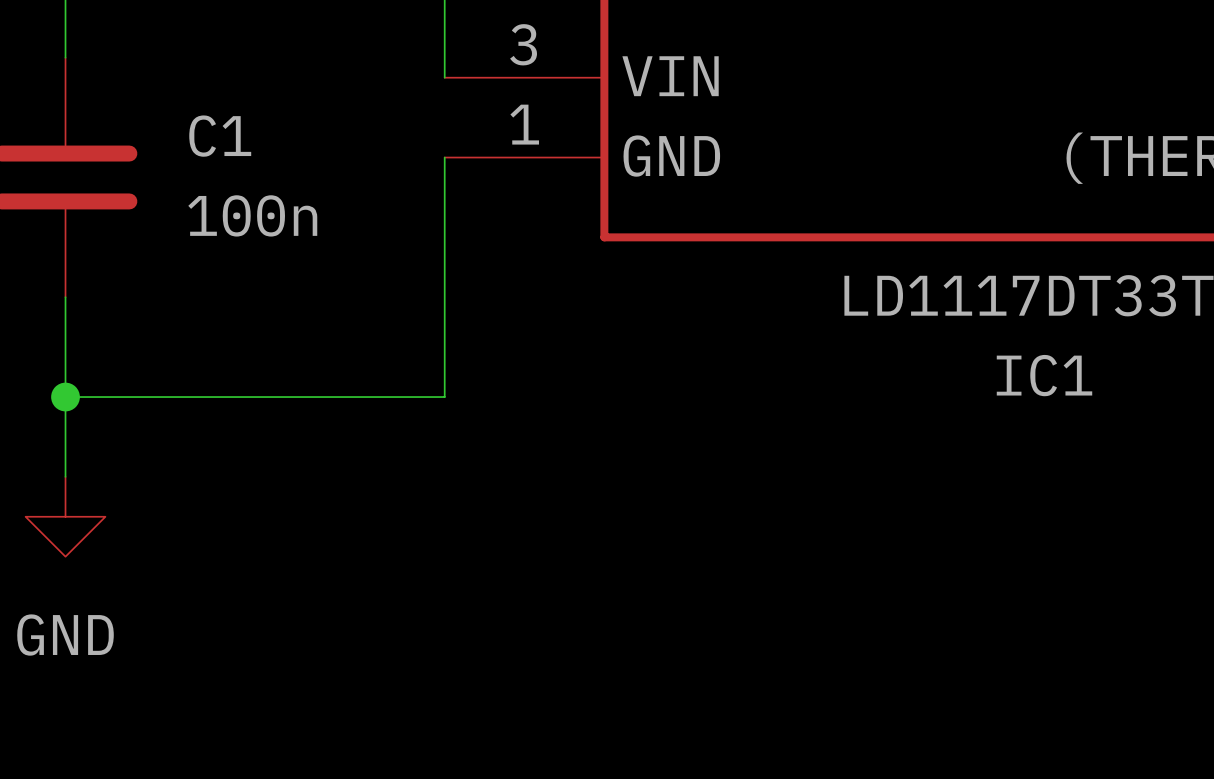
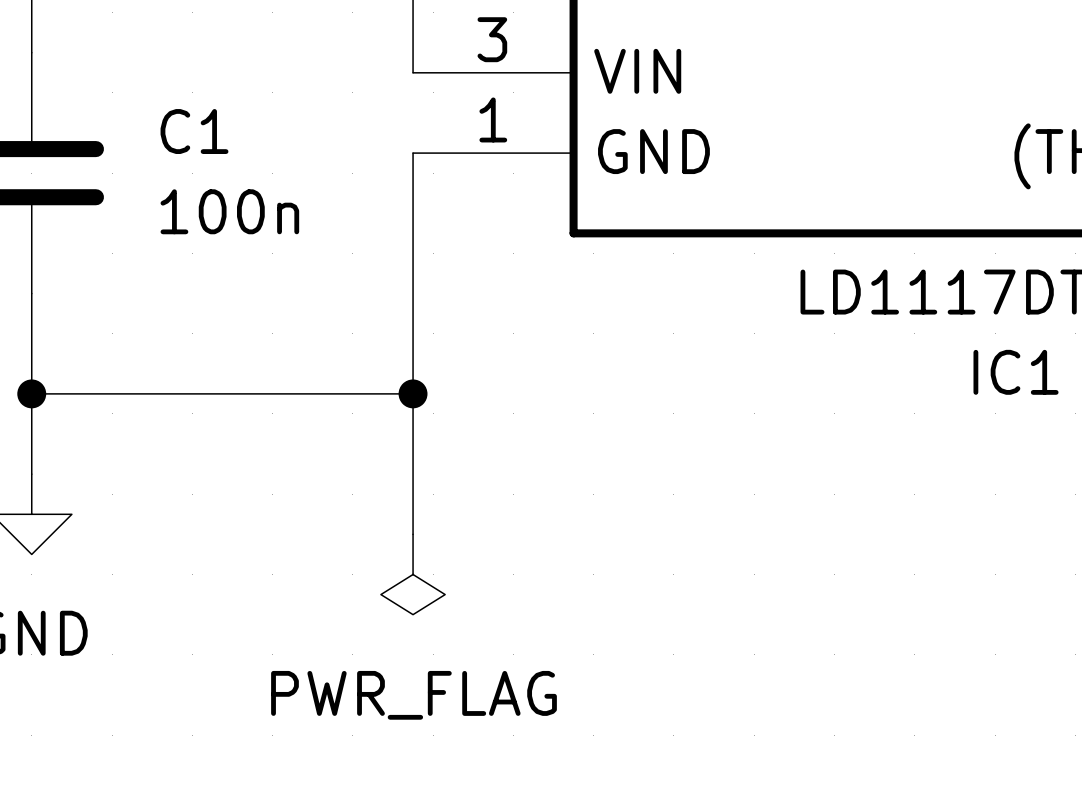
wire: none -> (413, 393) (413, 534)
junction: none -> (413, 393)
power symbol: none -> PWR_FLAG (413, 574)

